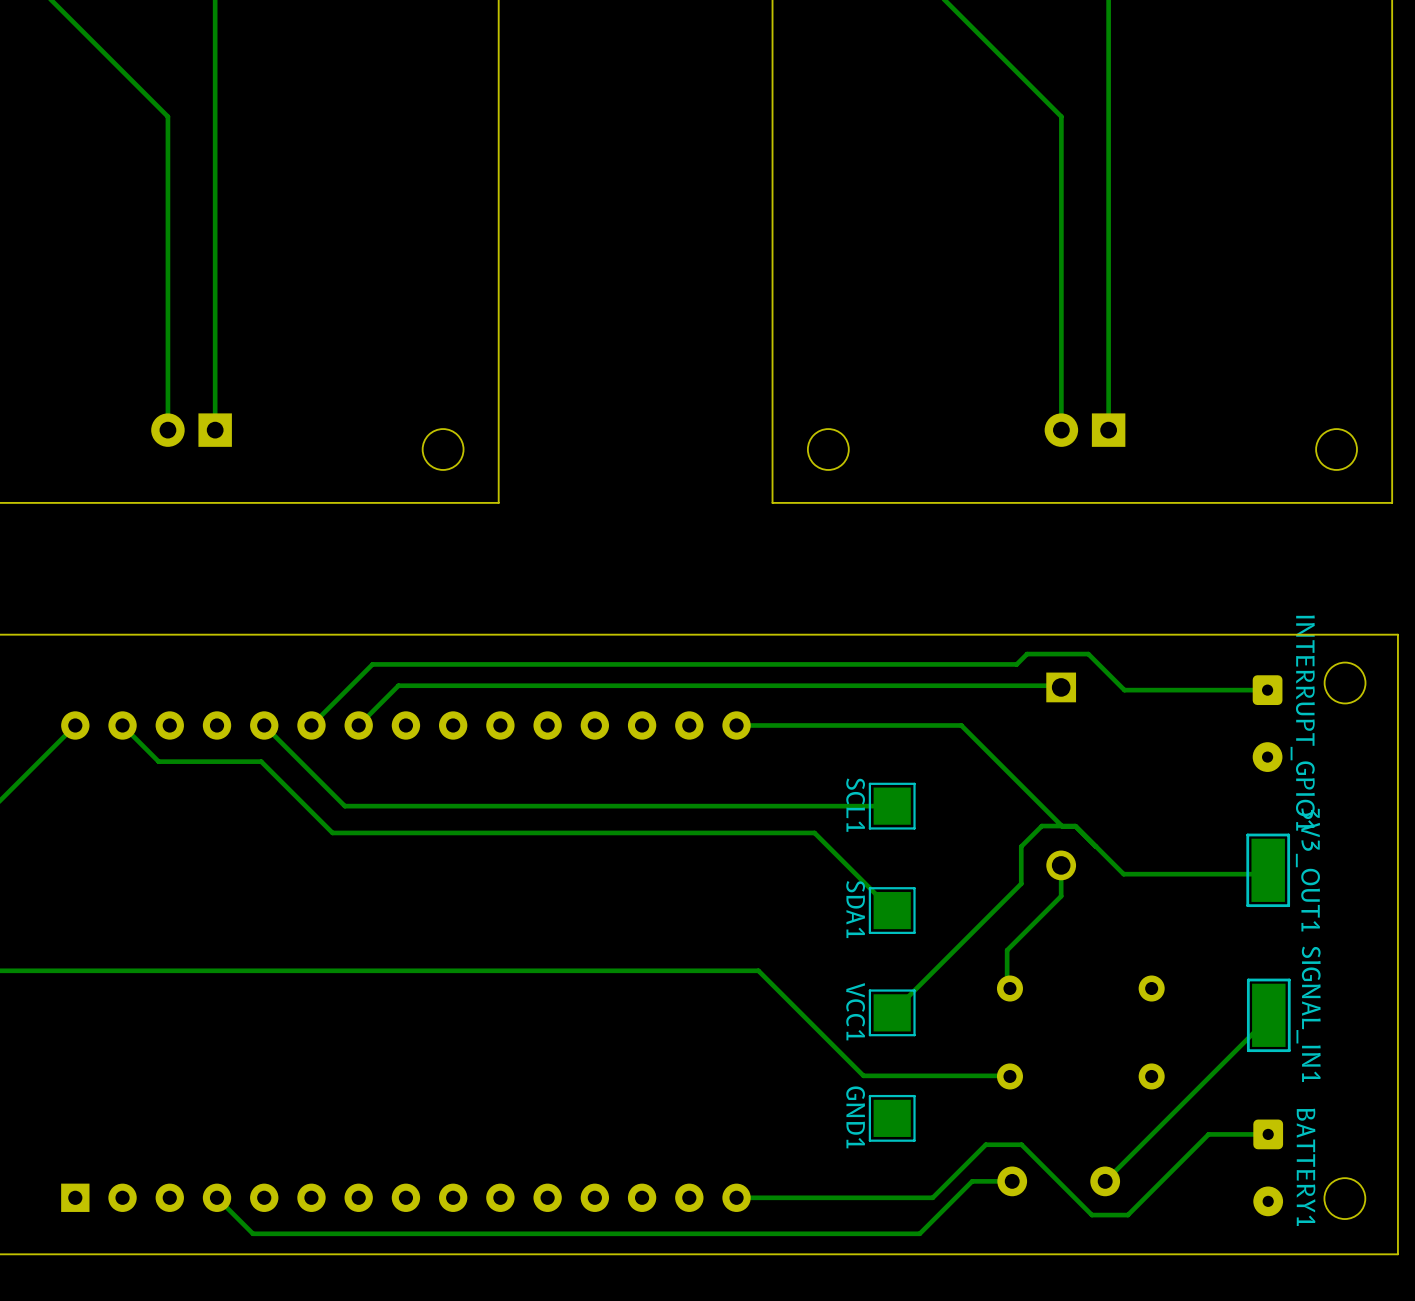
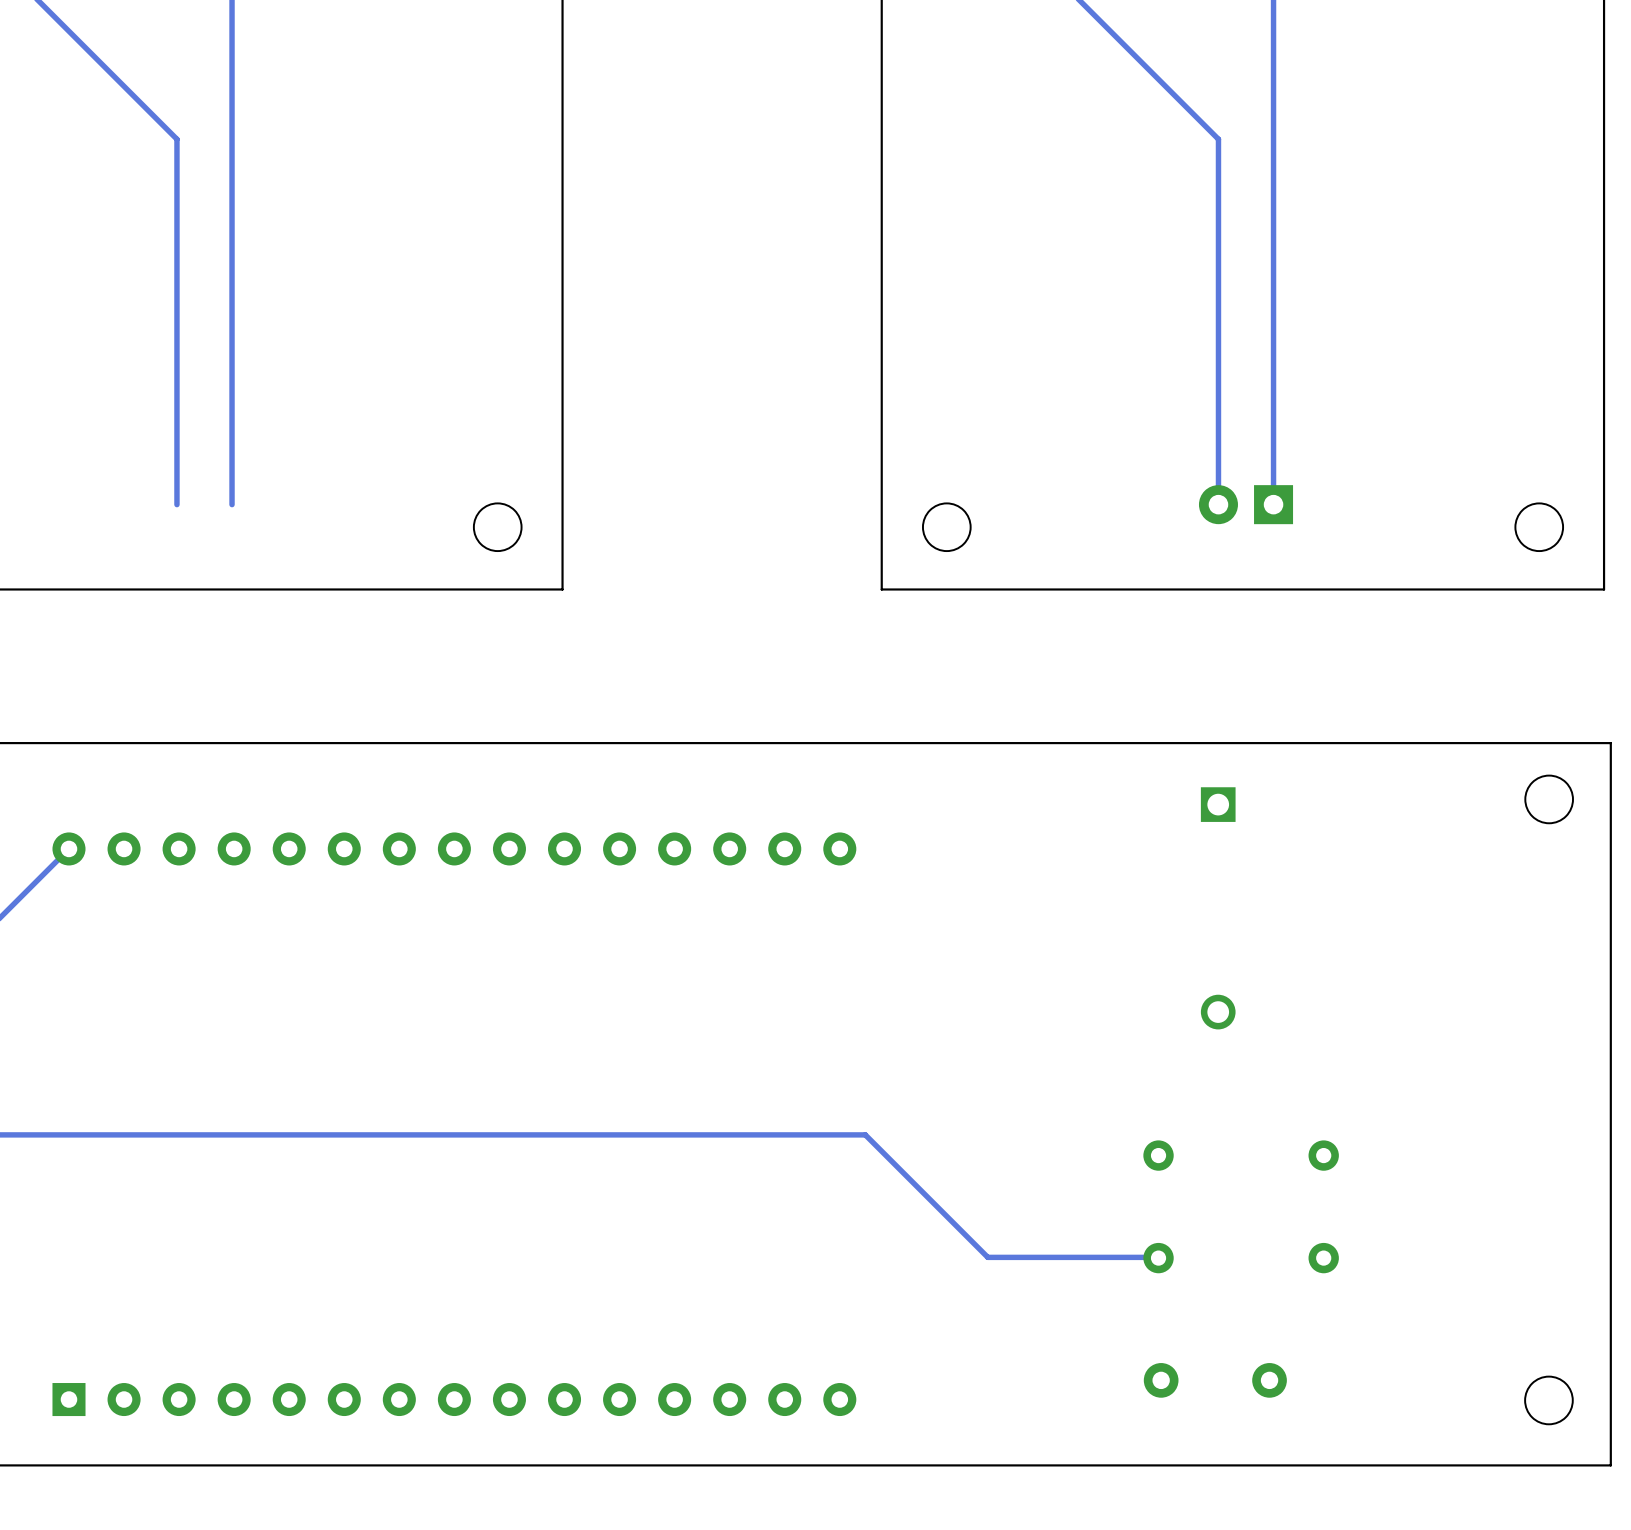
part: (191, 430) -> none
bottom track: (1061, 687) (1059, 685) (398, 685) (358, 725) -> none
bottom track: (1267, 690) (1124, 690) (1088, 654) (1027, 654) (1016, 664) (372, 664) (311, 725) -> none
INTERRUPT_GPIO1: (1267, 723) -> none
bottom track: (122, 725) (158, 761) (261, 761) (332, 832) (814, 832) (892, 910) -> none
bottom track: (264, 725) (344, 806) (892, 806) -> none
bottom track: (736, 725) (961, 725) (1062, 826) (1075, 826) (1123, 874) (1259, 874) (1268, 882) -> none
SCL1: (892, 806) -> none
bottom track: (1096, 846) (1075, 826) (1041, 826) (1021, 846) (1021, 883) (892, 1012) -> none
bottom track: (1061, 865) (1061, 896) (1007, 950) (1007, 985) (1009, 988) -> none
3V3_OUT1: (1268, 870) -> none
SDA1: (892, 910) -> none
VCC1: (892, 1012) -> none
bottom track: (1268, 1015) (1268, 1017) (1105, 1181) -> none
SIGNAL_IN1: (1268, 1015) -> none
GND1: (892, 1118) -> none
bottom track: (1268, 1134) (1208, 1134) (1127, 1215) (1091, 1215) (1021, 1144) (985, 1144) (932, 1197) (736, 1197) -> none
BATTERY1: (1268, 1167) -> none
bottom track: (1012, 1181) (972, 1181) (919, 1233) (252, 1233) (217, 1197) -> none

